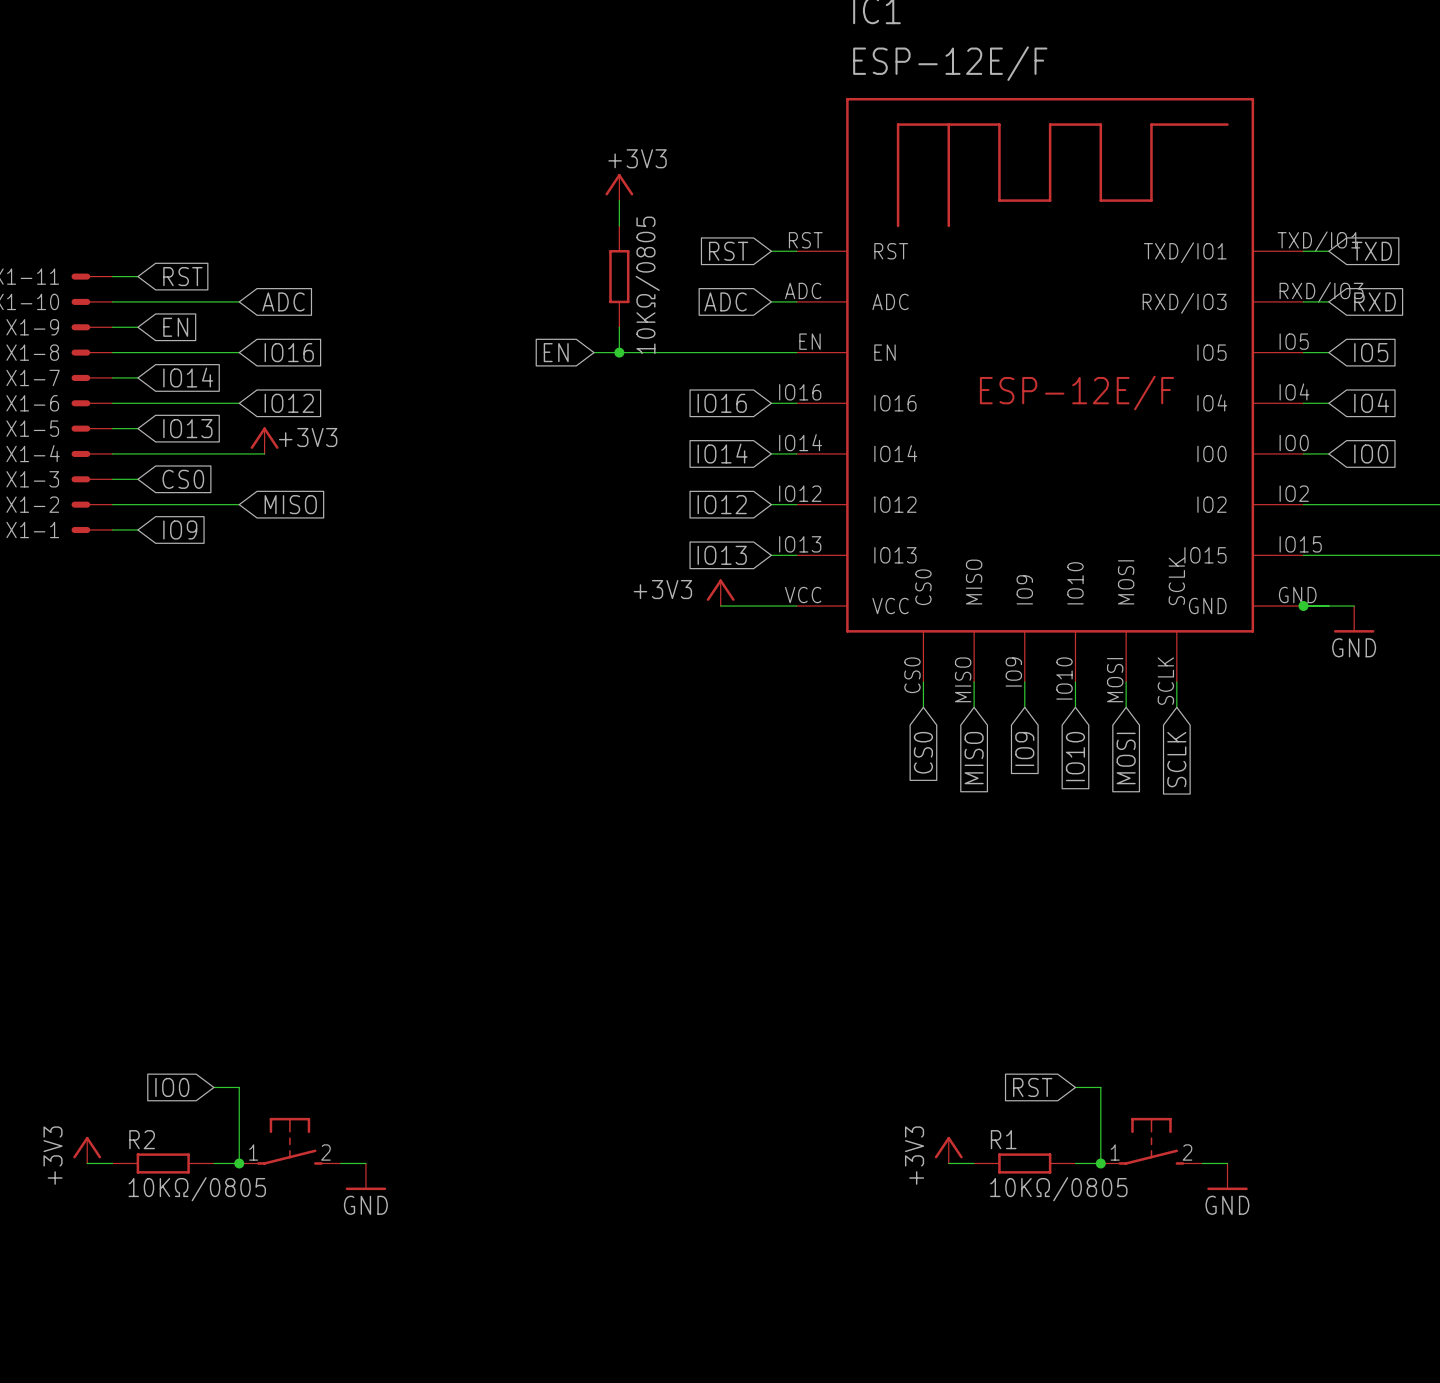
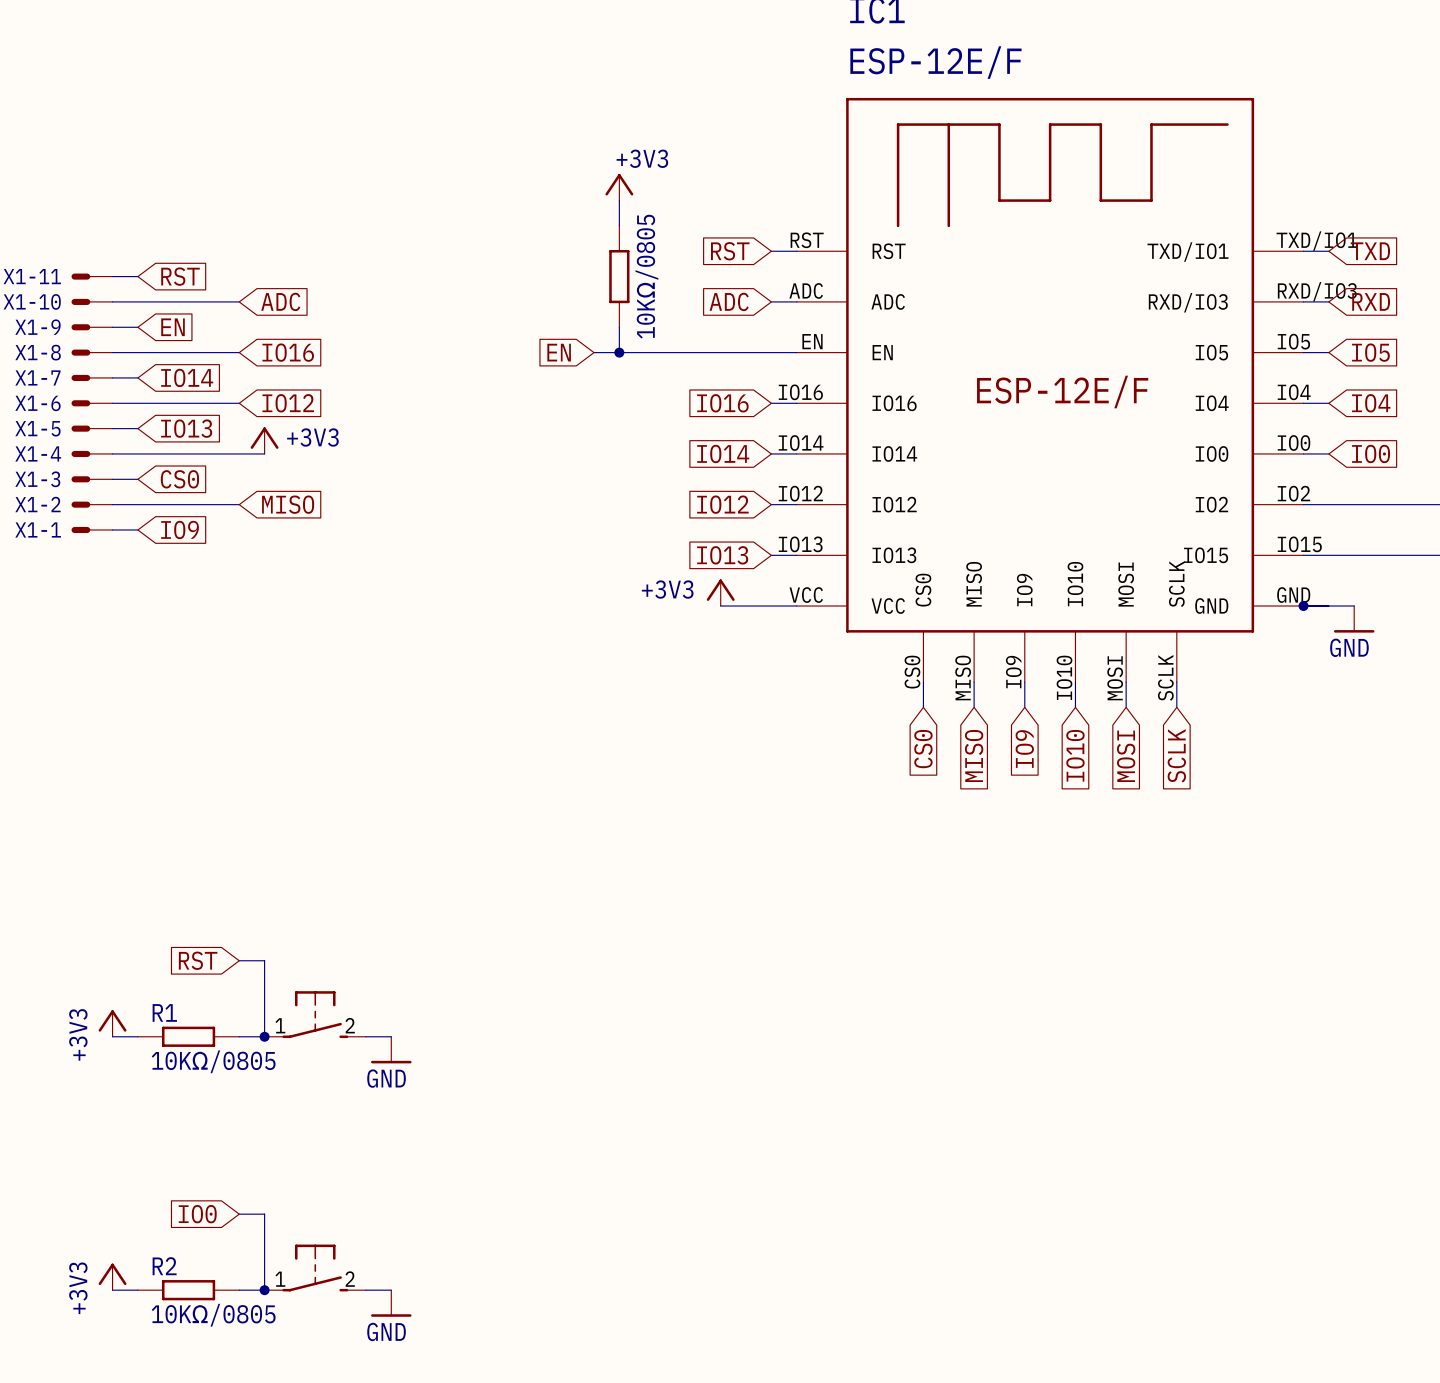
global label: none -> RST (198, 960)
part: none -> (315, 1014)
power symbol: none -> +3V3 (112, 1023)
wire: none -> (112, 1036) (137, 1036)
junction: none -> (264, 1036)
wire: none -> (365, 1036) (391, 1036)
power symbol: none -> GND (391, 1050)
global label position: IO0 (172, 1087) -> IO0 (197, 1214)
wire: (213, 1087) (239, 1087) (239, 1163) (213, 1163) -> (239, 960) (264, 960) (264, 1036) (239, 1036)
global label: RST (1032, 1087) -> none
wire: (1075, 1087) (1100, 1087) (1100, 1163) (1075, 1163) -> none
part: (289, 1141) -> none
part: (1151, 1141) -> none
power symbol: +3V3 (87, 1150) -> none
power symbol: +3V3 (948, 1150) -> none
wire: (87, 1163) (112, 1163) -> (112, 1290) (137, 1290)
R2 position: (163, 1163) -> (188, 1290)
junction: (239, 1163) -> none
wire: (340, 1163) (365, 1163) -> (365, 1290) (391, 1290)
wire: (948, 1163) (974, 1163) -> none
R1 position: (1024, 1163) -> (188, 1036)
junction: (1100, 1163) -> none
wire: (1202, 1163) (1227, 1163) -> none
power symbol: GND (365, 1176) -> none
power symbol: GND (1227, 1176) -> none
wire: none -> (239, 1214) (264, 1214) (264, 1290) (239, 1290)
part: none -> (315, 1268)
power symbol: none -> +3V3 (112, 1276)
junction: none -> (264, 1290)
power symbol: none -> GND (391, 1303)

